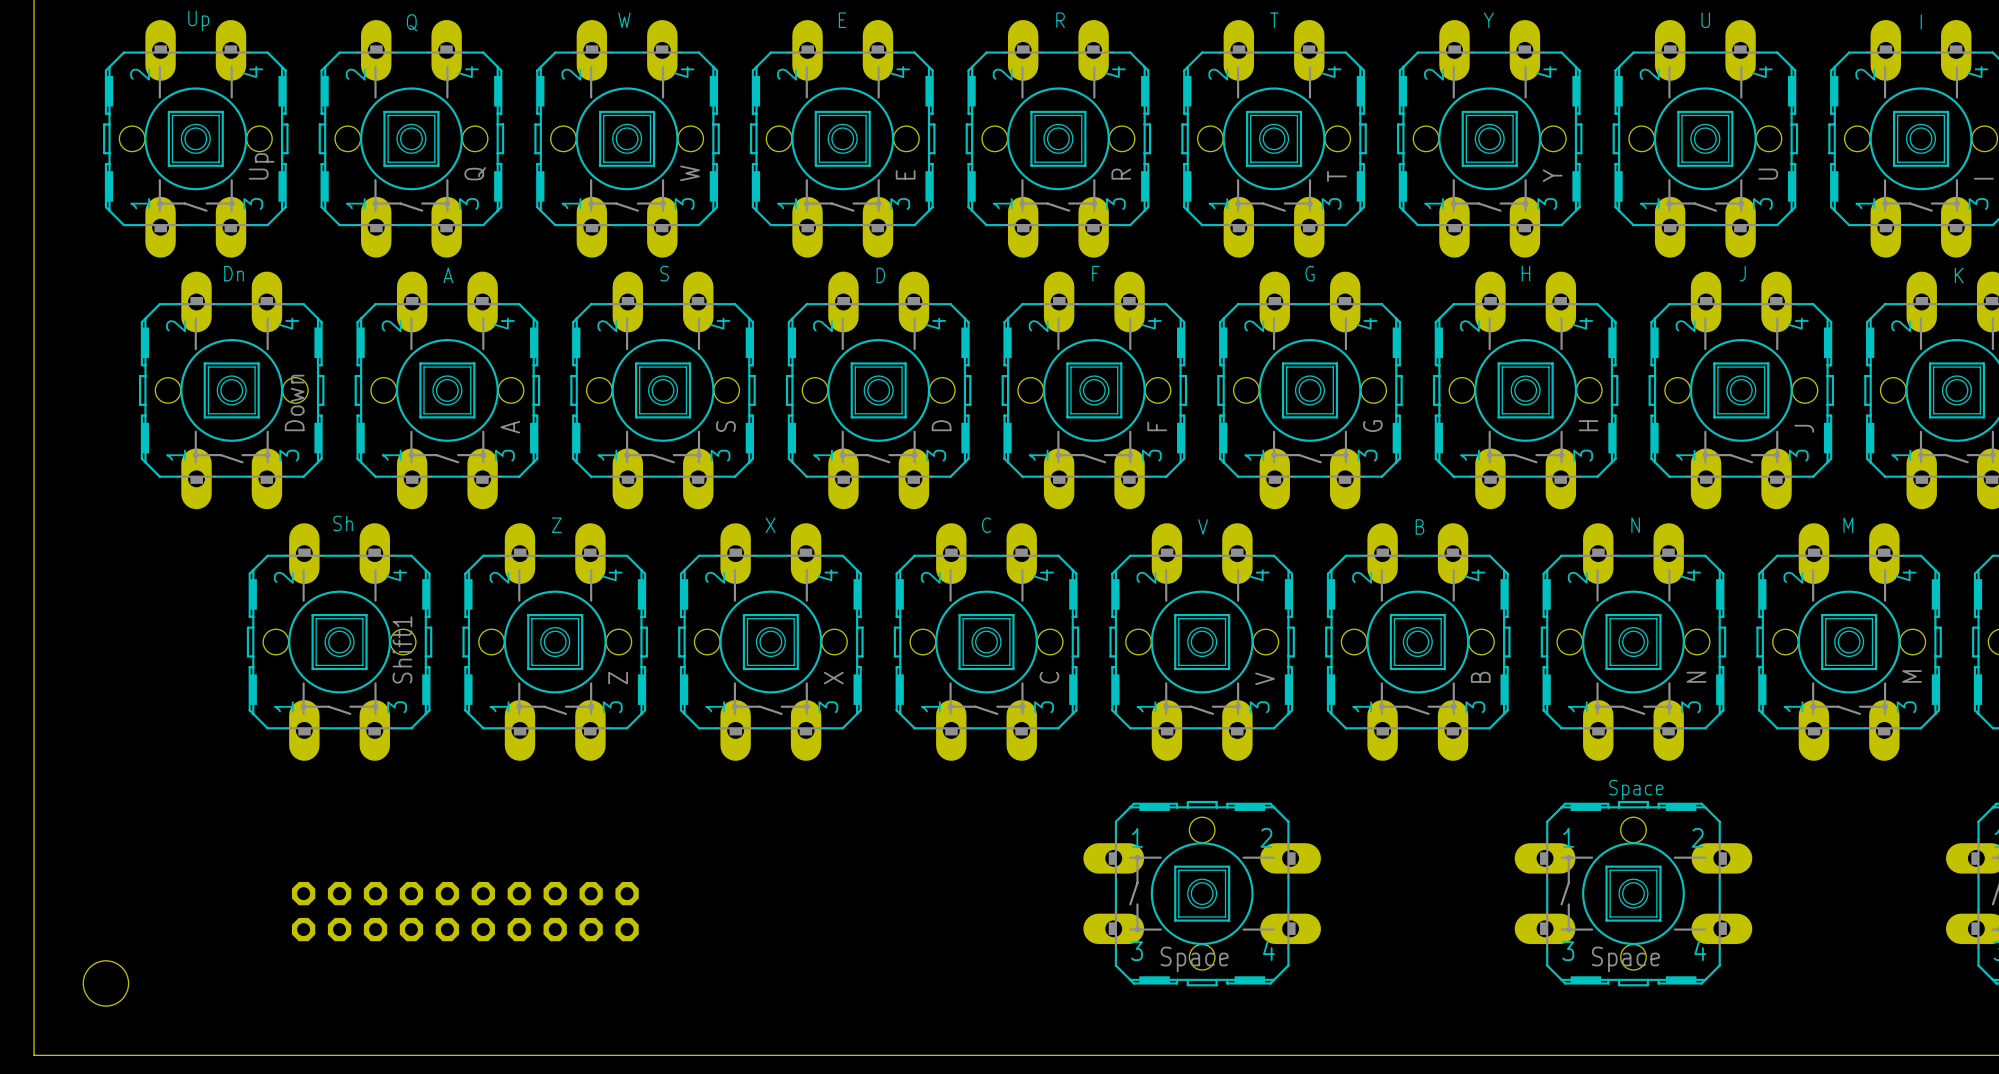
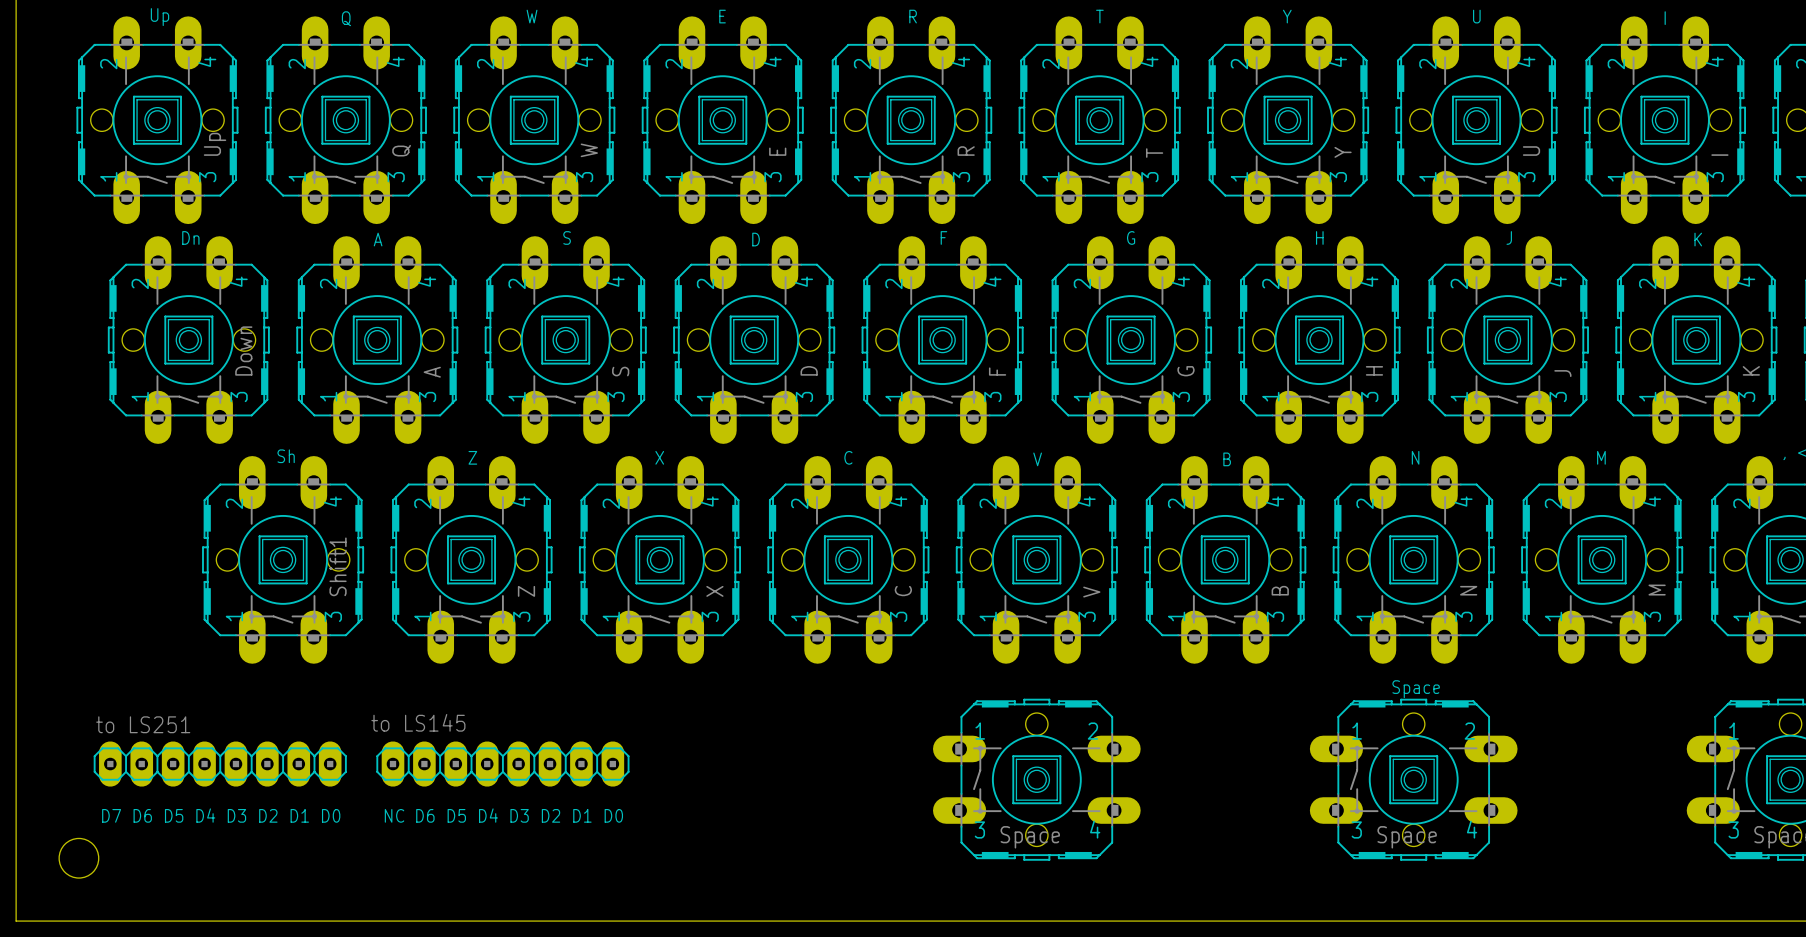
part: none -> to LS251 (220, 764)
part: none -> to LS145 (502, 764)
part: (465, 911) -> none
text: none -> D7 (111, 815)
text: none -> D6 (142, 815)
text: none -> D5 (174, 815)
text: none -> D4 (205, 815)
text: none -> D3 (236, 815)
text: none -> D2 (268, 815)
text: none -> D1 (299, 815)
text: none -> D0 (331, 815)
text: none -> NC (394, 815)
text: none -> D6 (425, 815)
text: none -> D5 (456, 815)
text: none -> D4 (488, 815)
text: none -> D3 (519, 815)
text: none -> D2 (551, 815)
text: none -> D1 (582, 815)
text: none -> D0 (613, 815)

